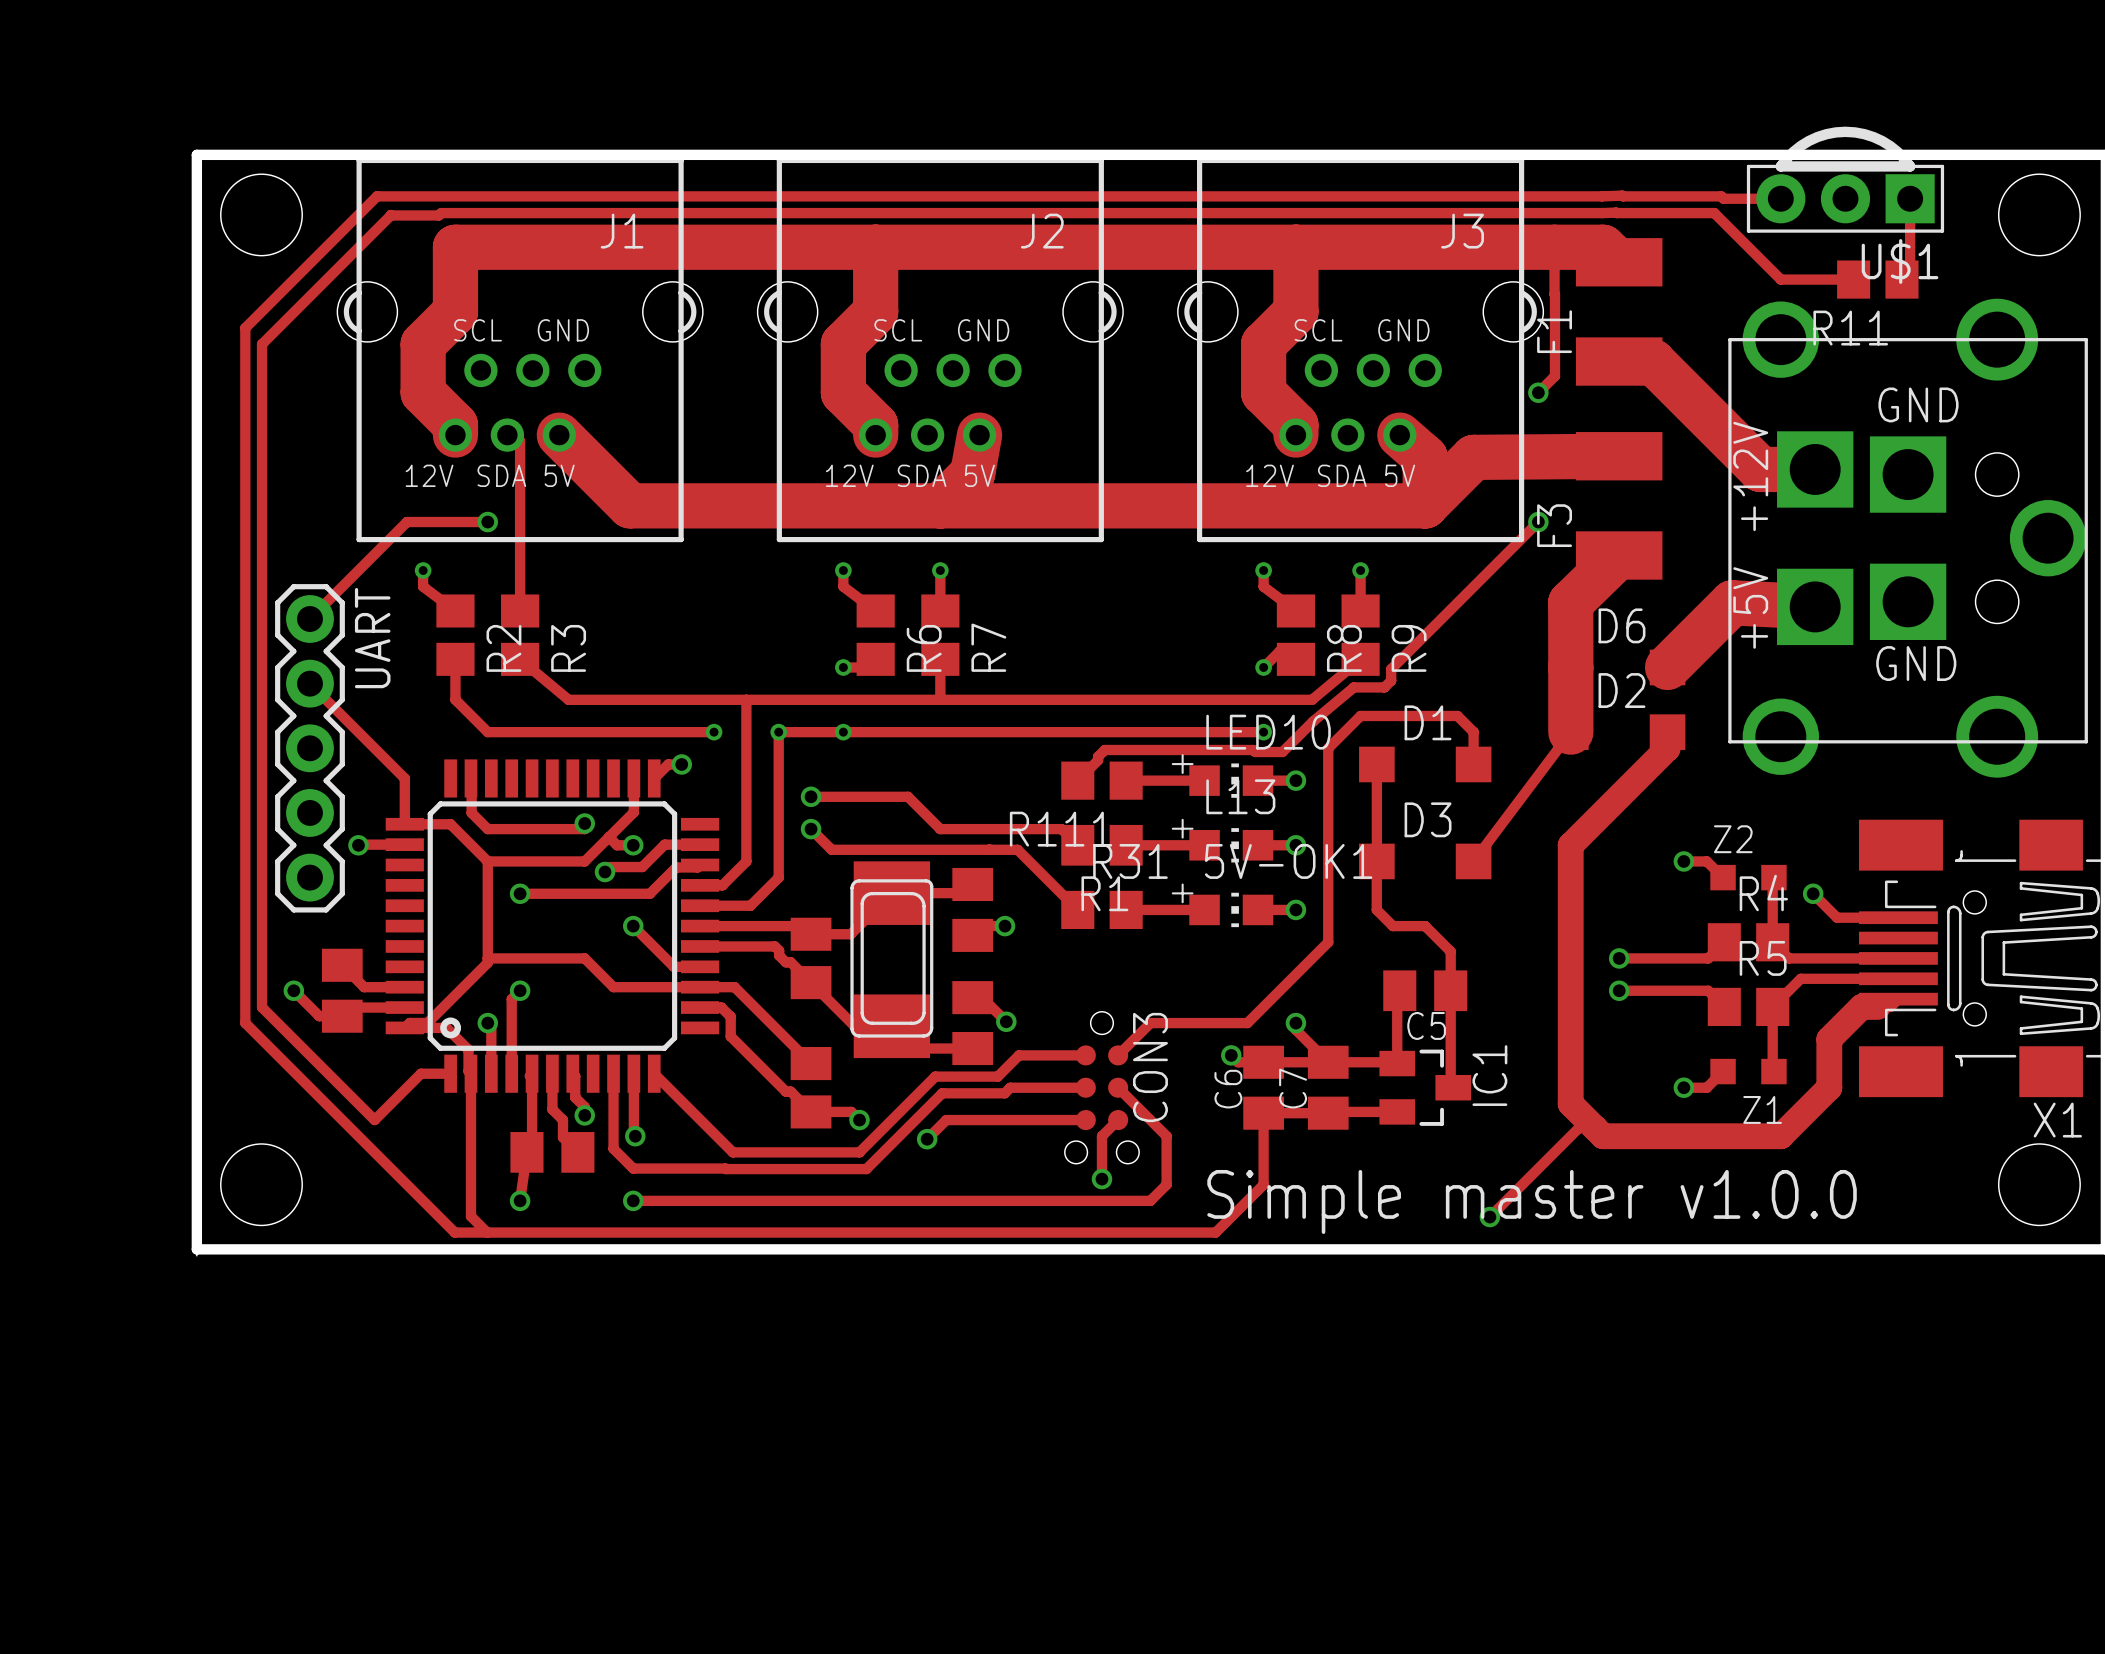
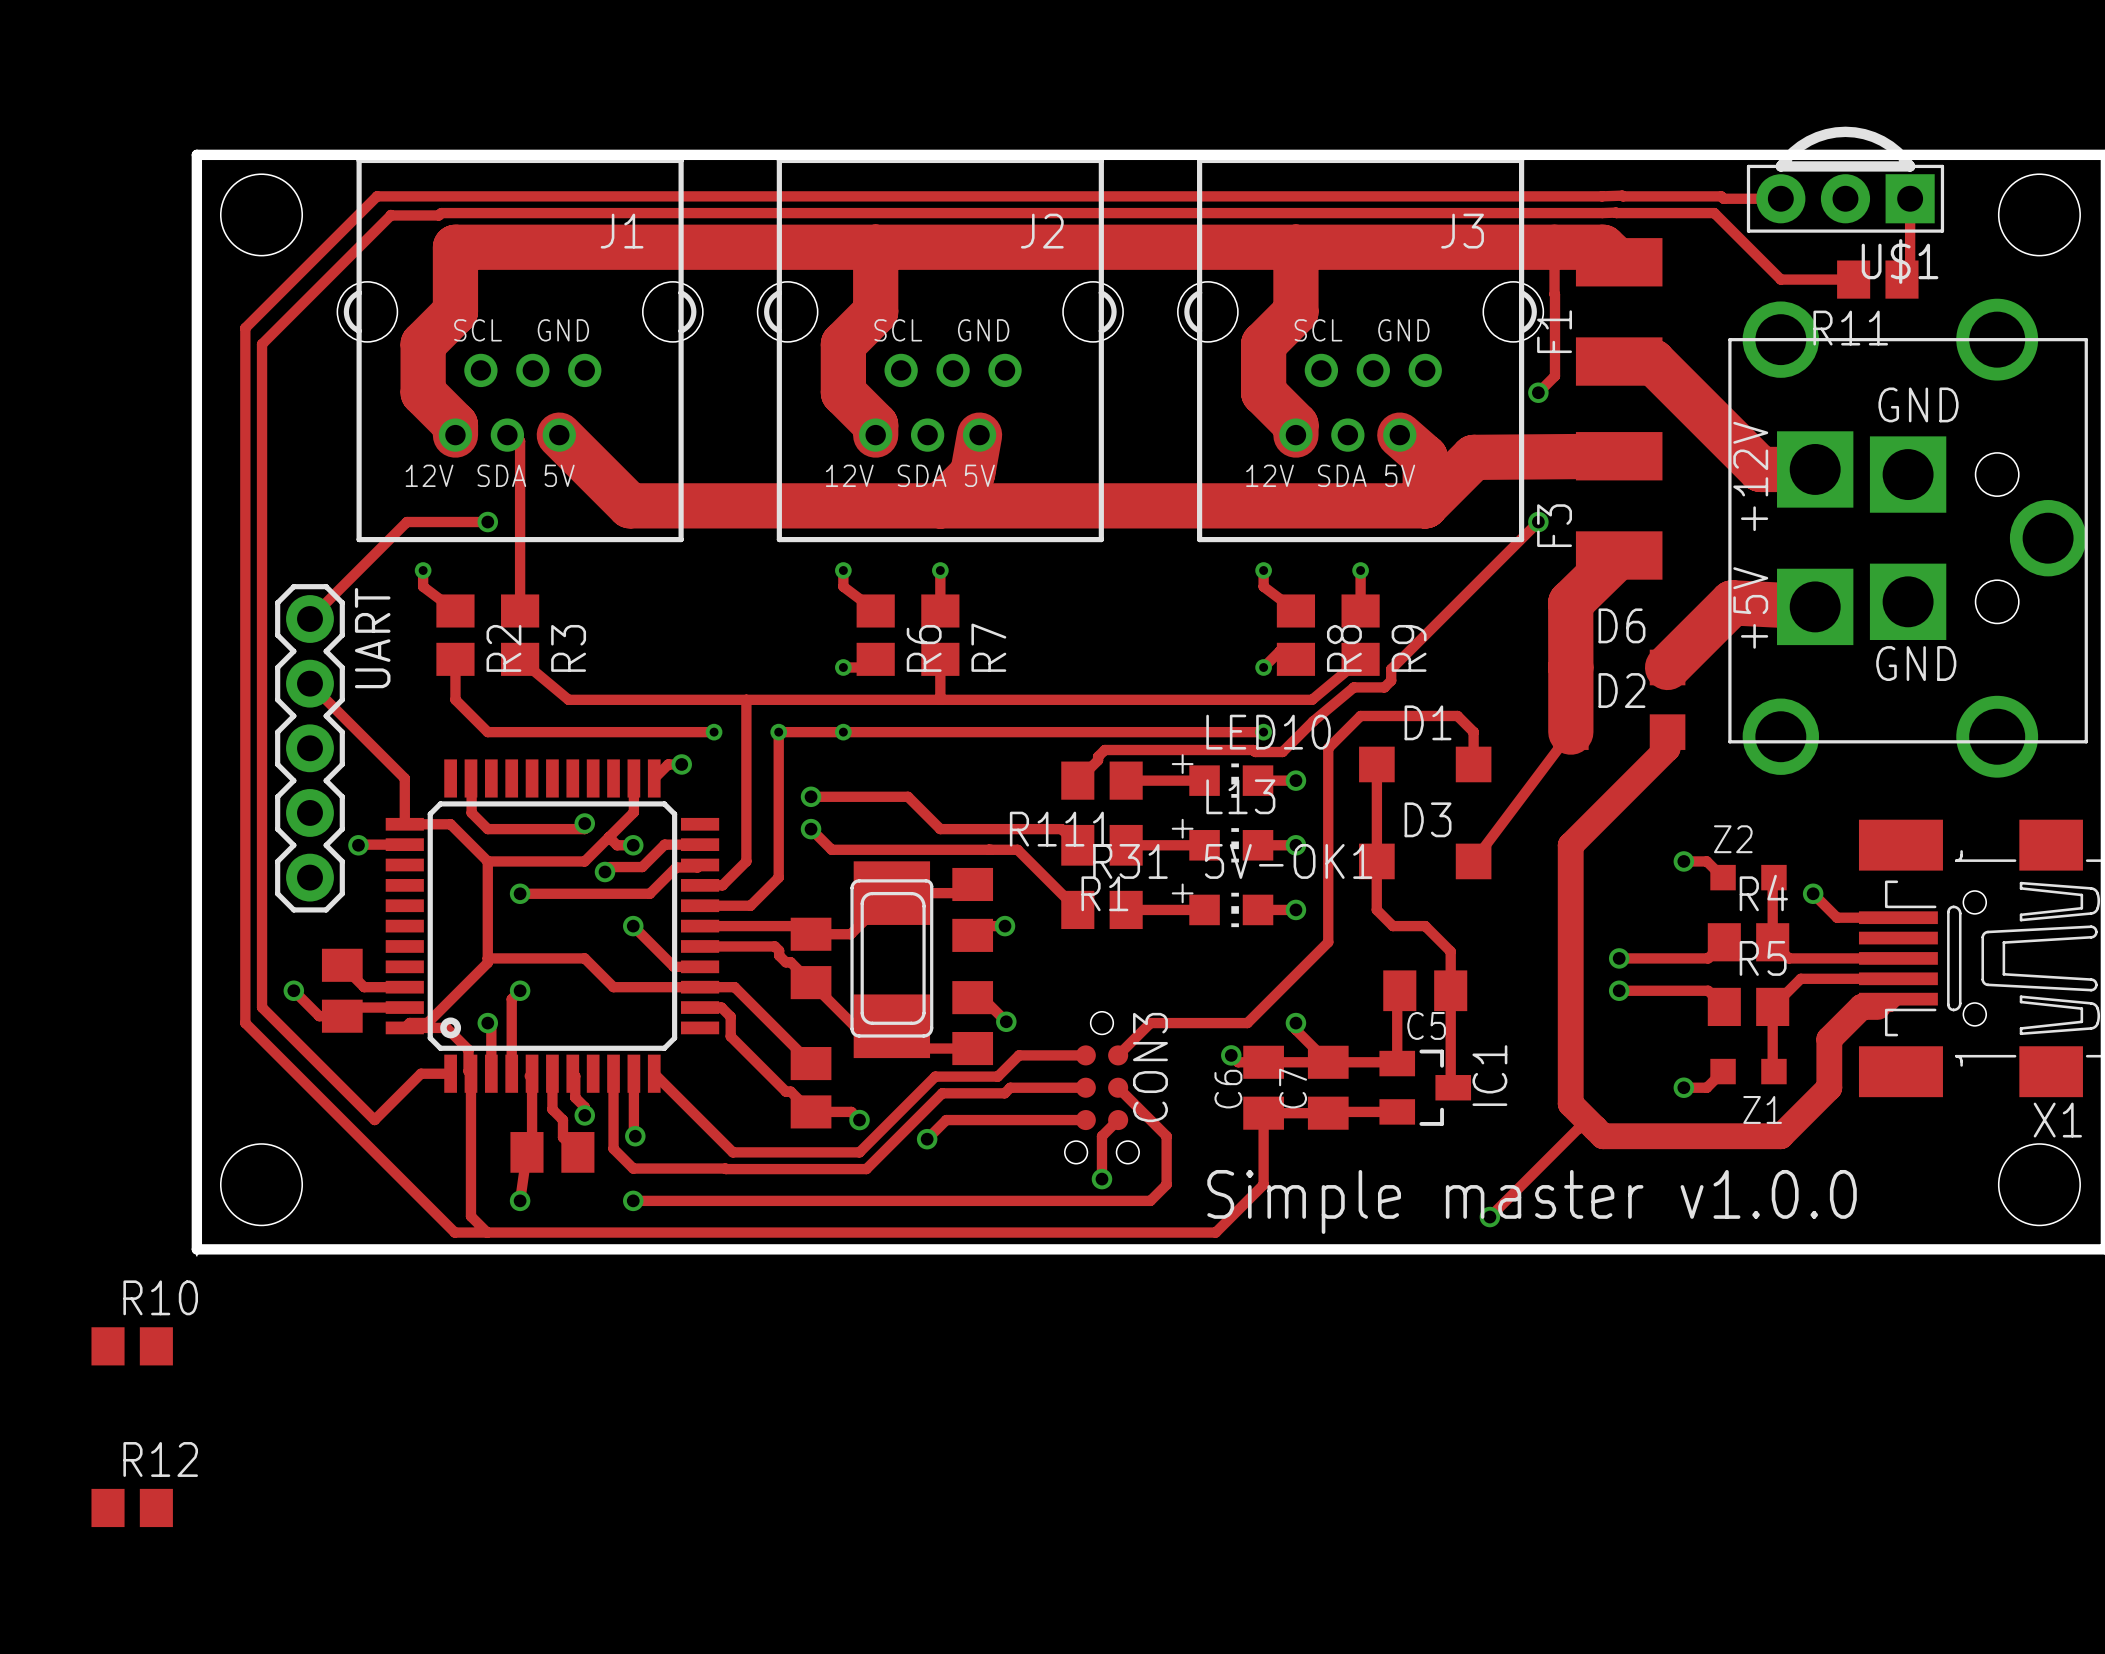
R10: none -> (132, 1346)
R12: none -> (132, 1507)

